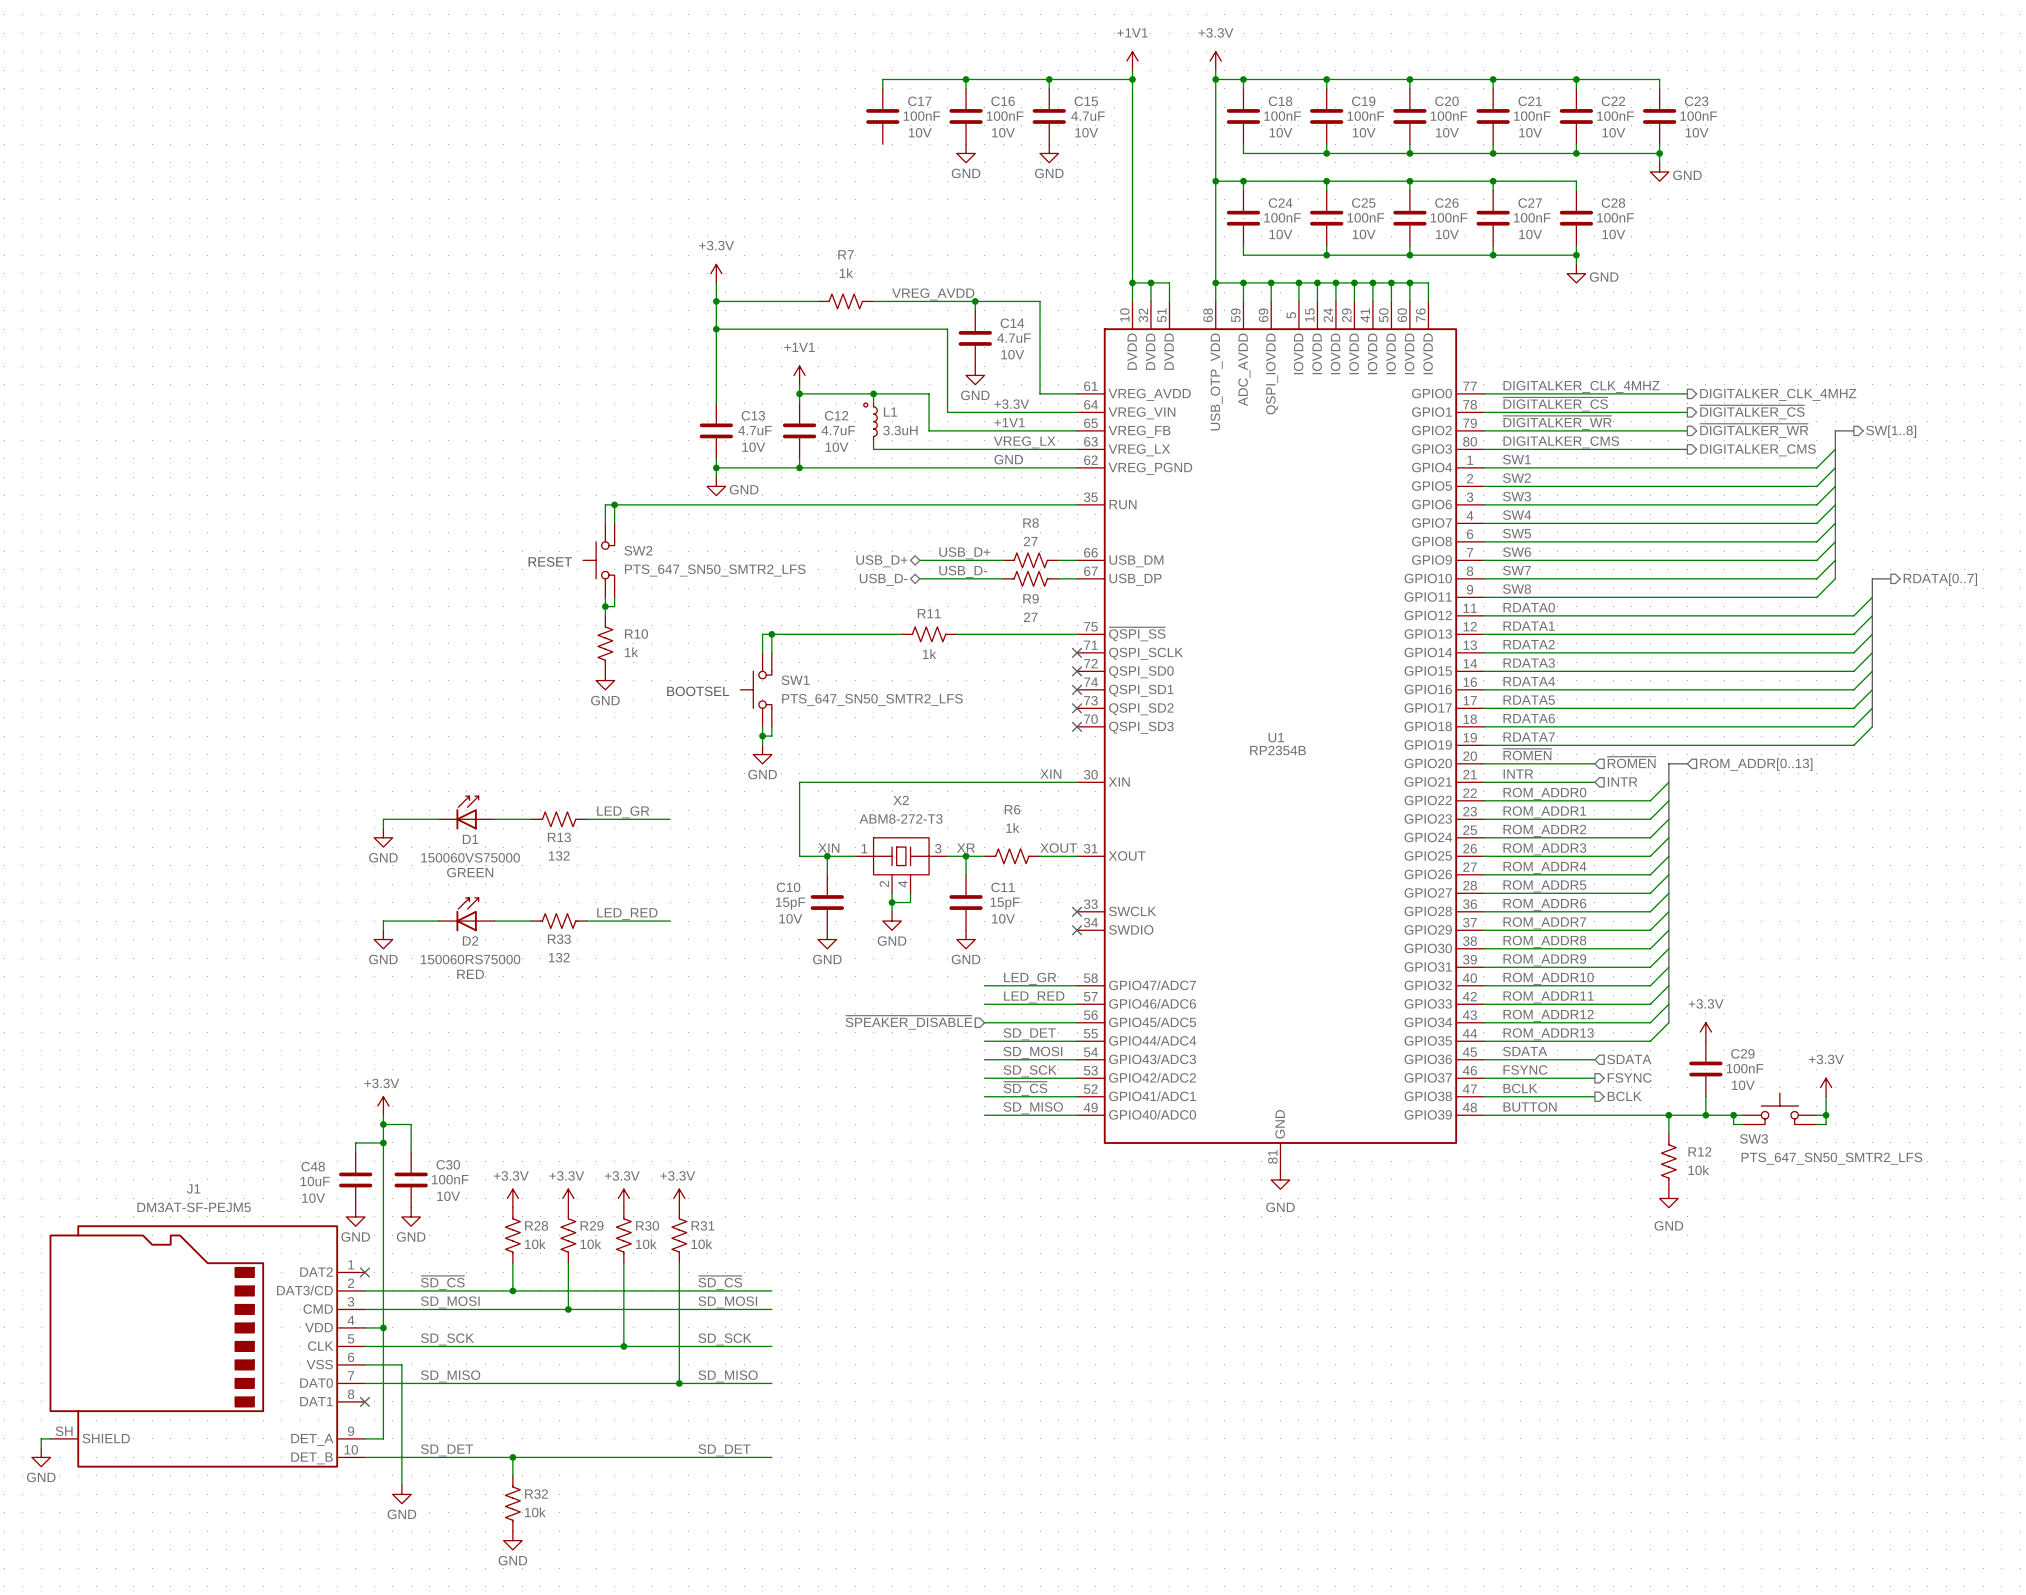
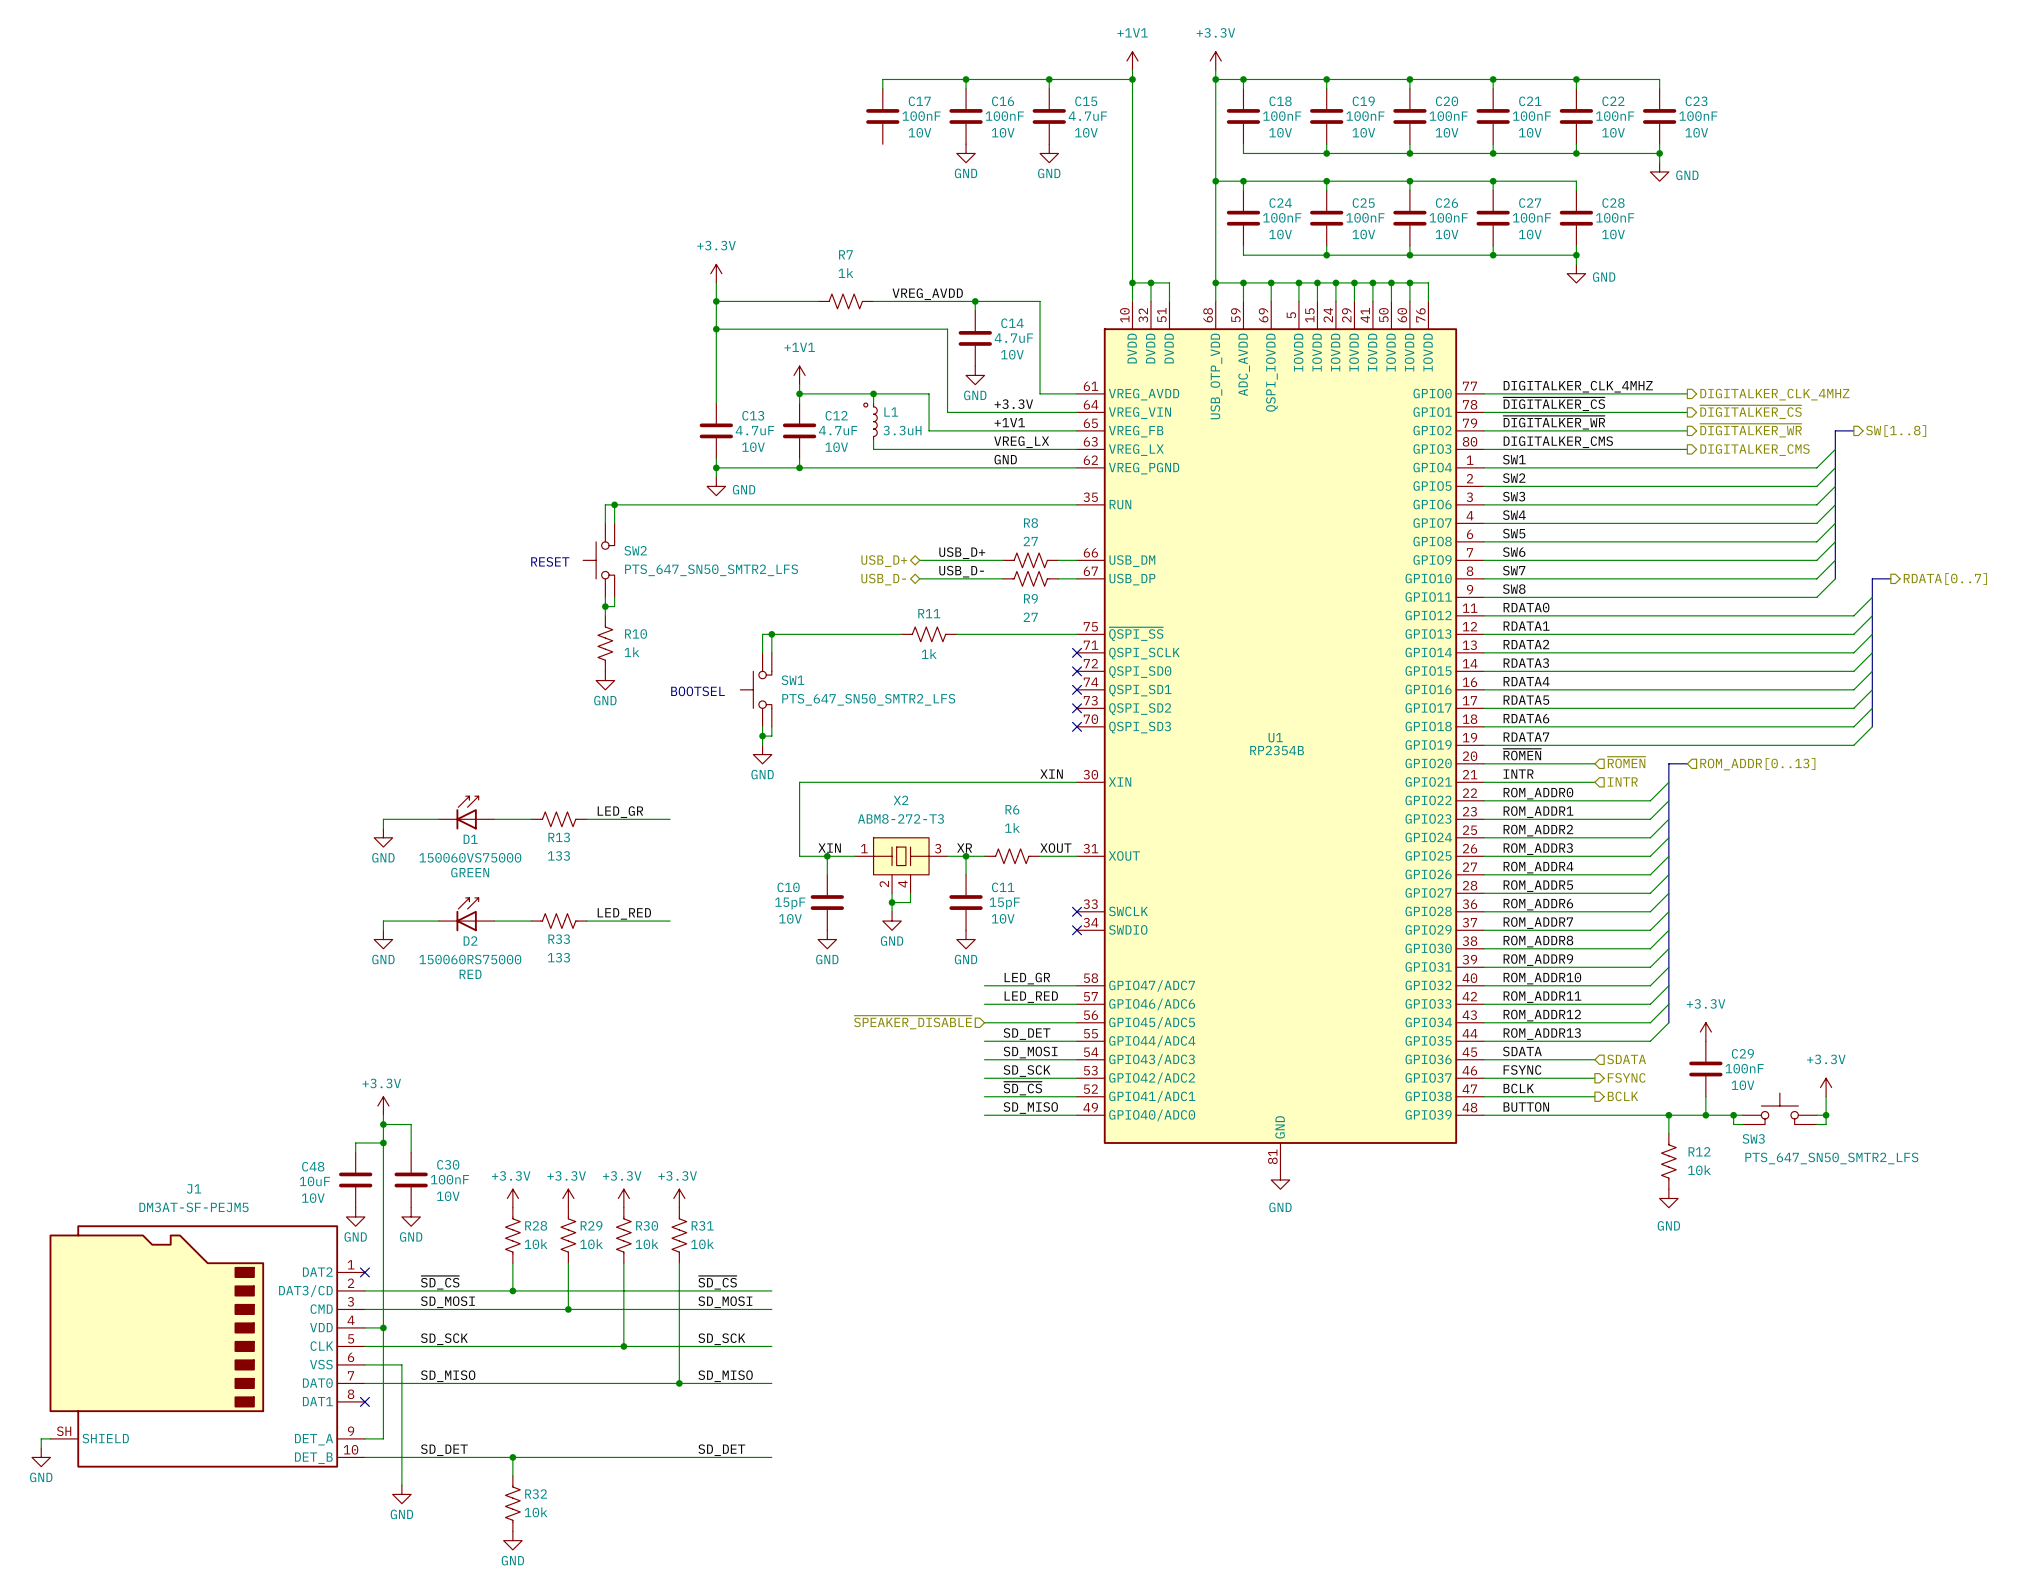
R13 value: 132 (559, 855) -> 133 (558, 855)
R33 value: 132 (559, 957) -> 133 (558, 957)

